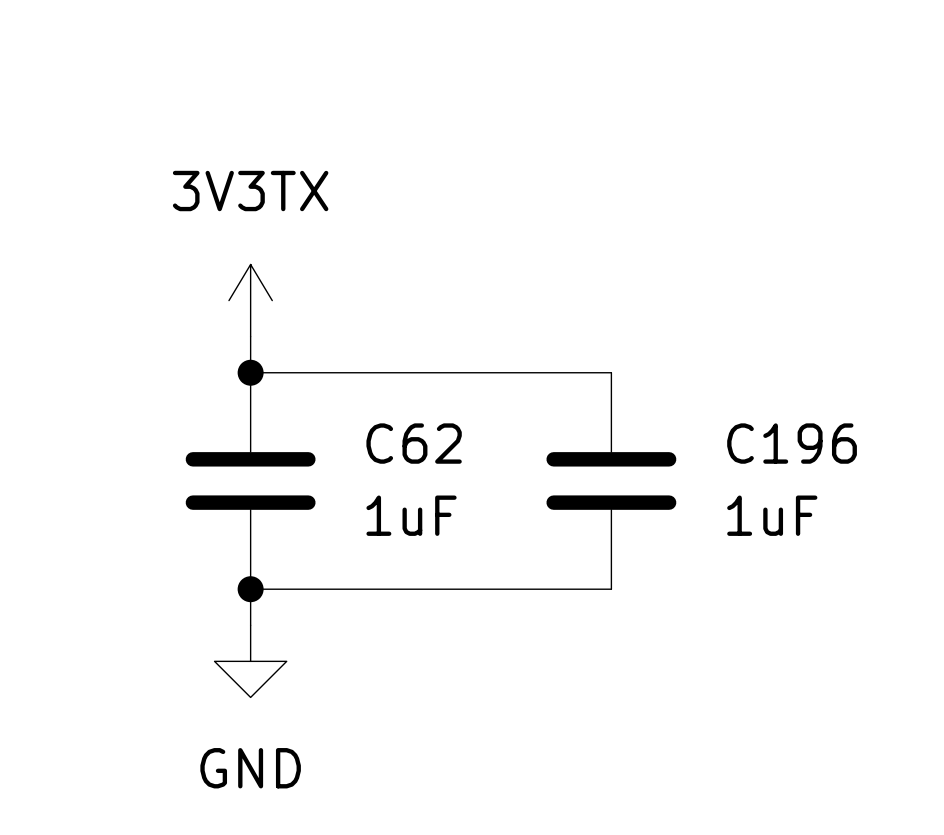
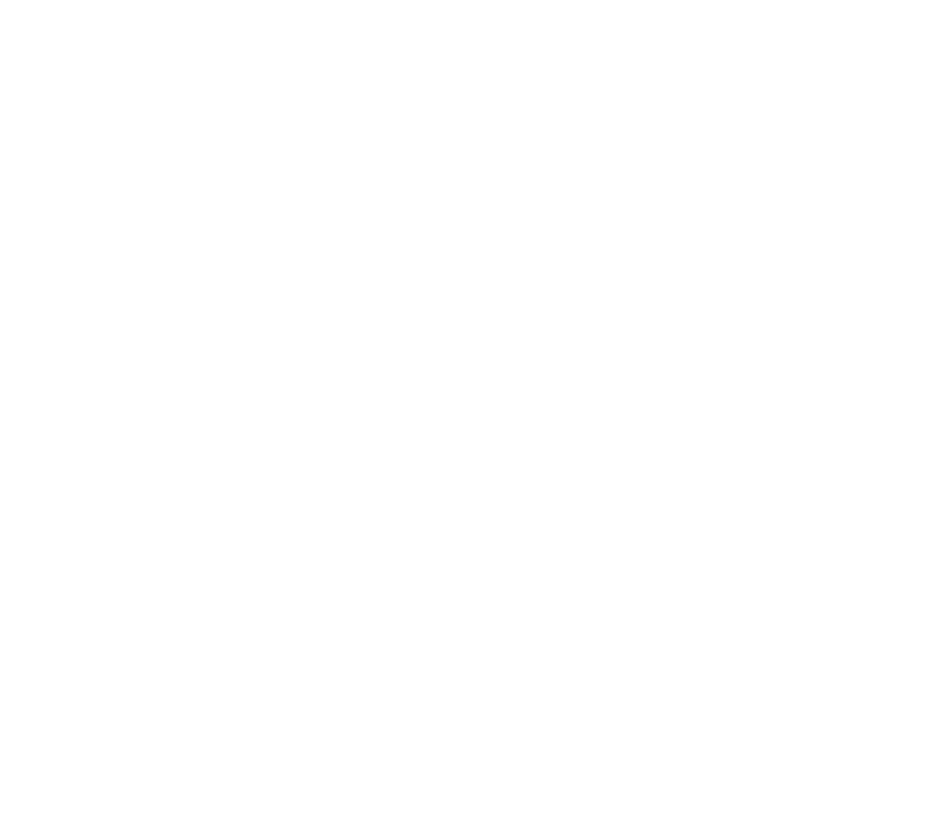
power symbol: 3V3TX (250, 300) -> none
wire: (250, 336) (250, 372) (611, 372) -> none
junction: (250, 372) -> none
C62: 1uF (250, 480) -> none
C196: 1uF (611, 480) -> none
junction: (250, 589) -> none
wire: (611, 589) (250, 589) (250, 625) -> none
power symbol: GND (250, 661) -> none

